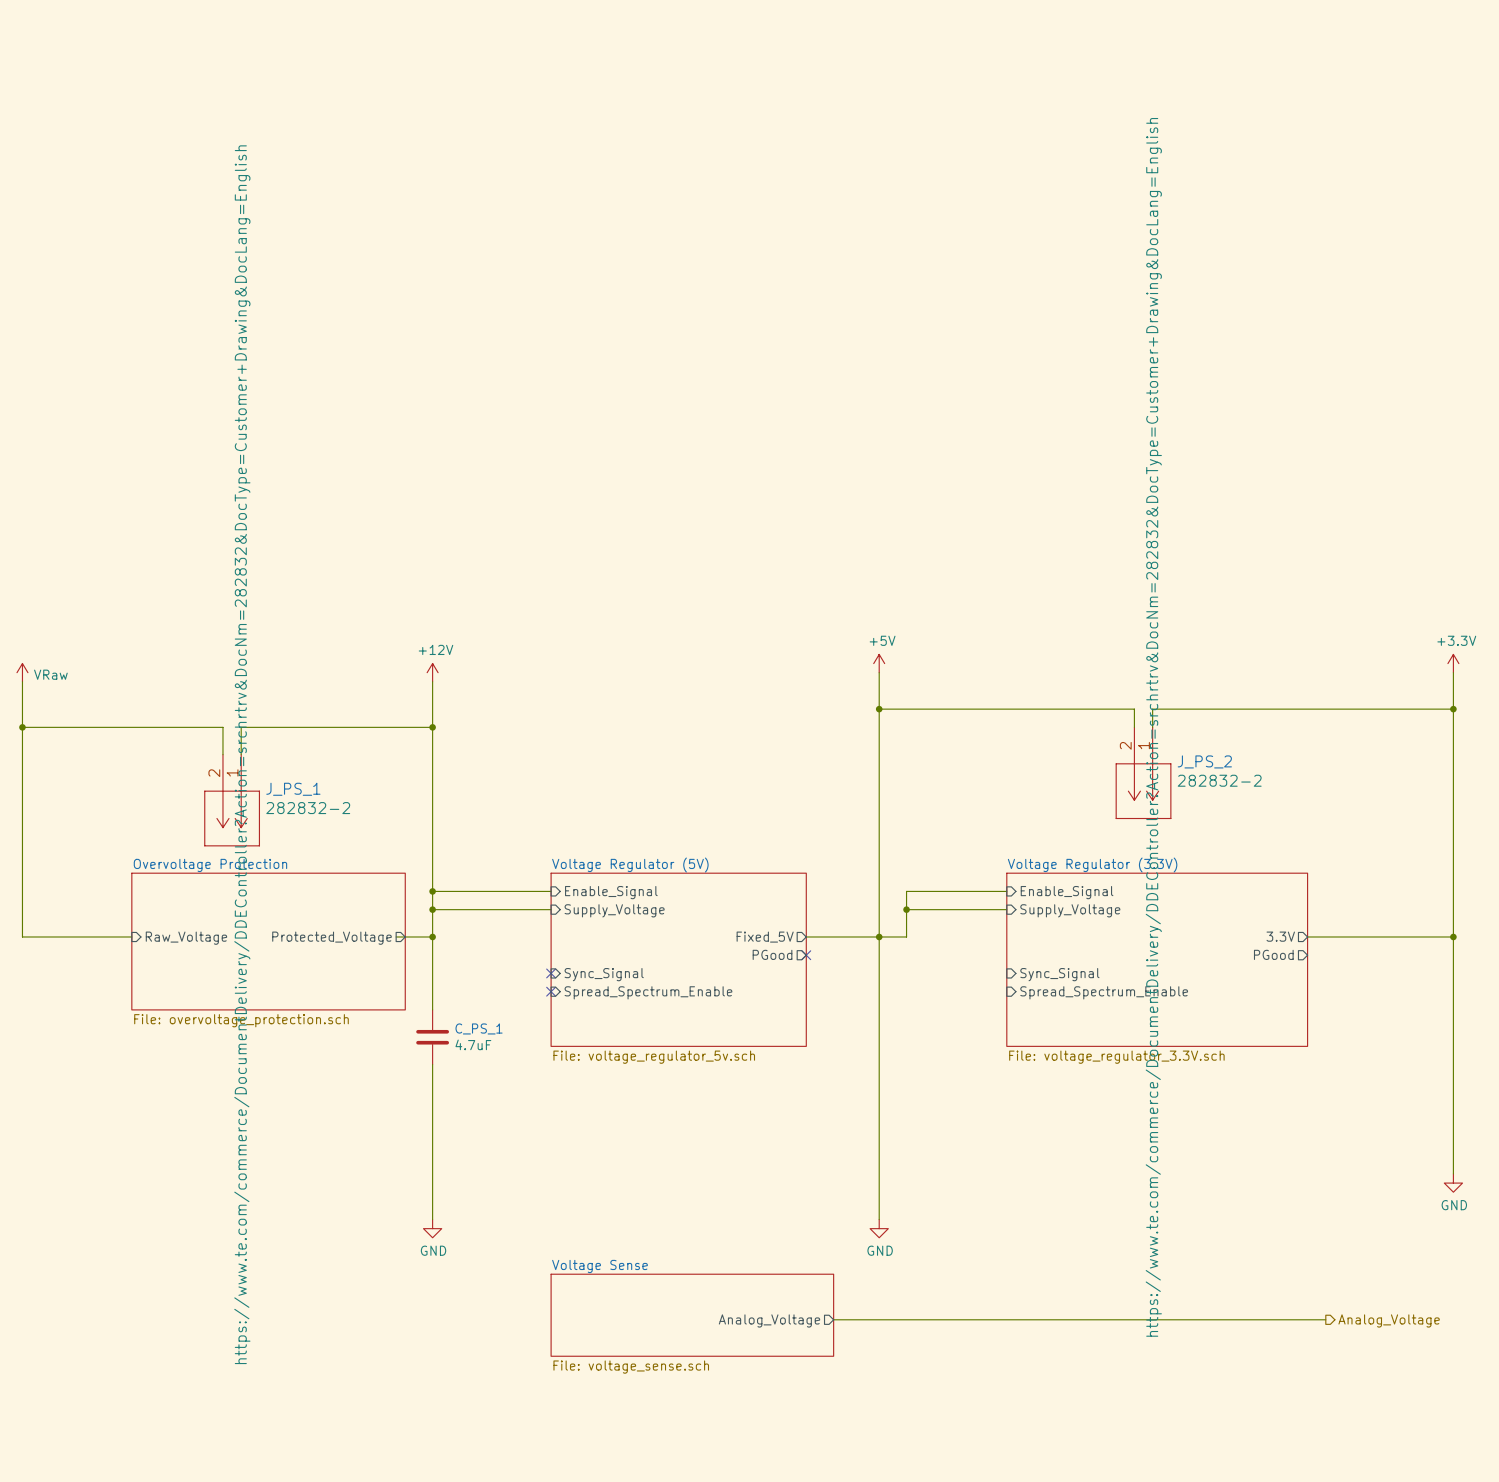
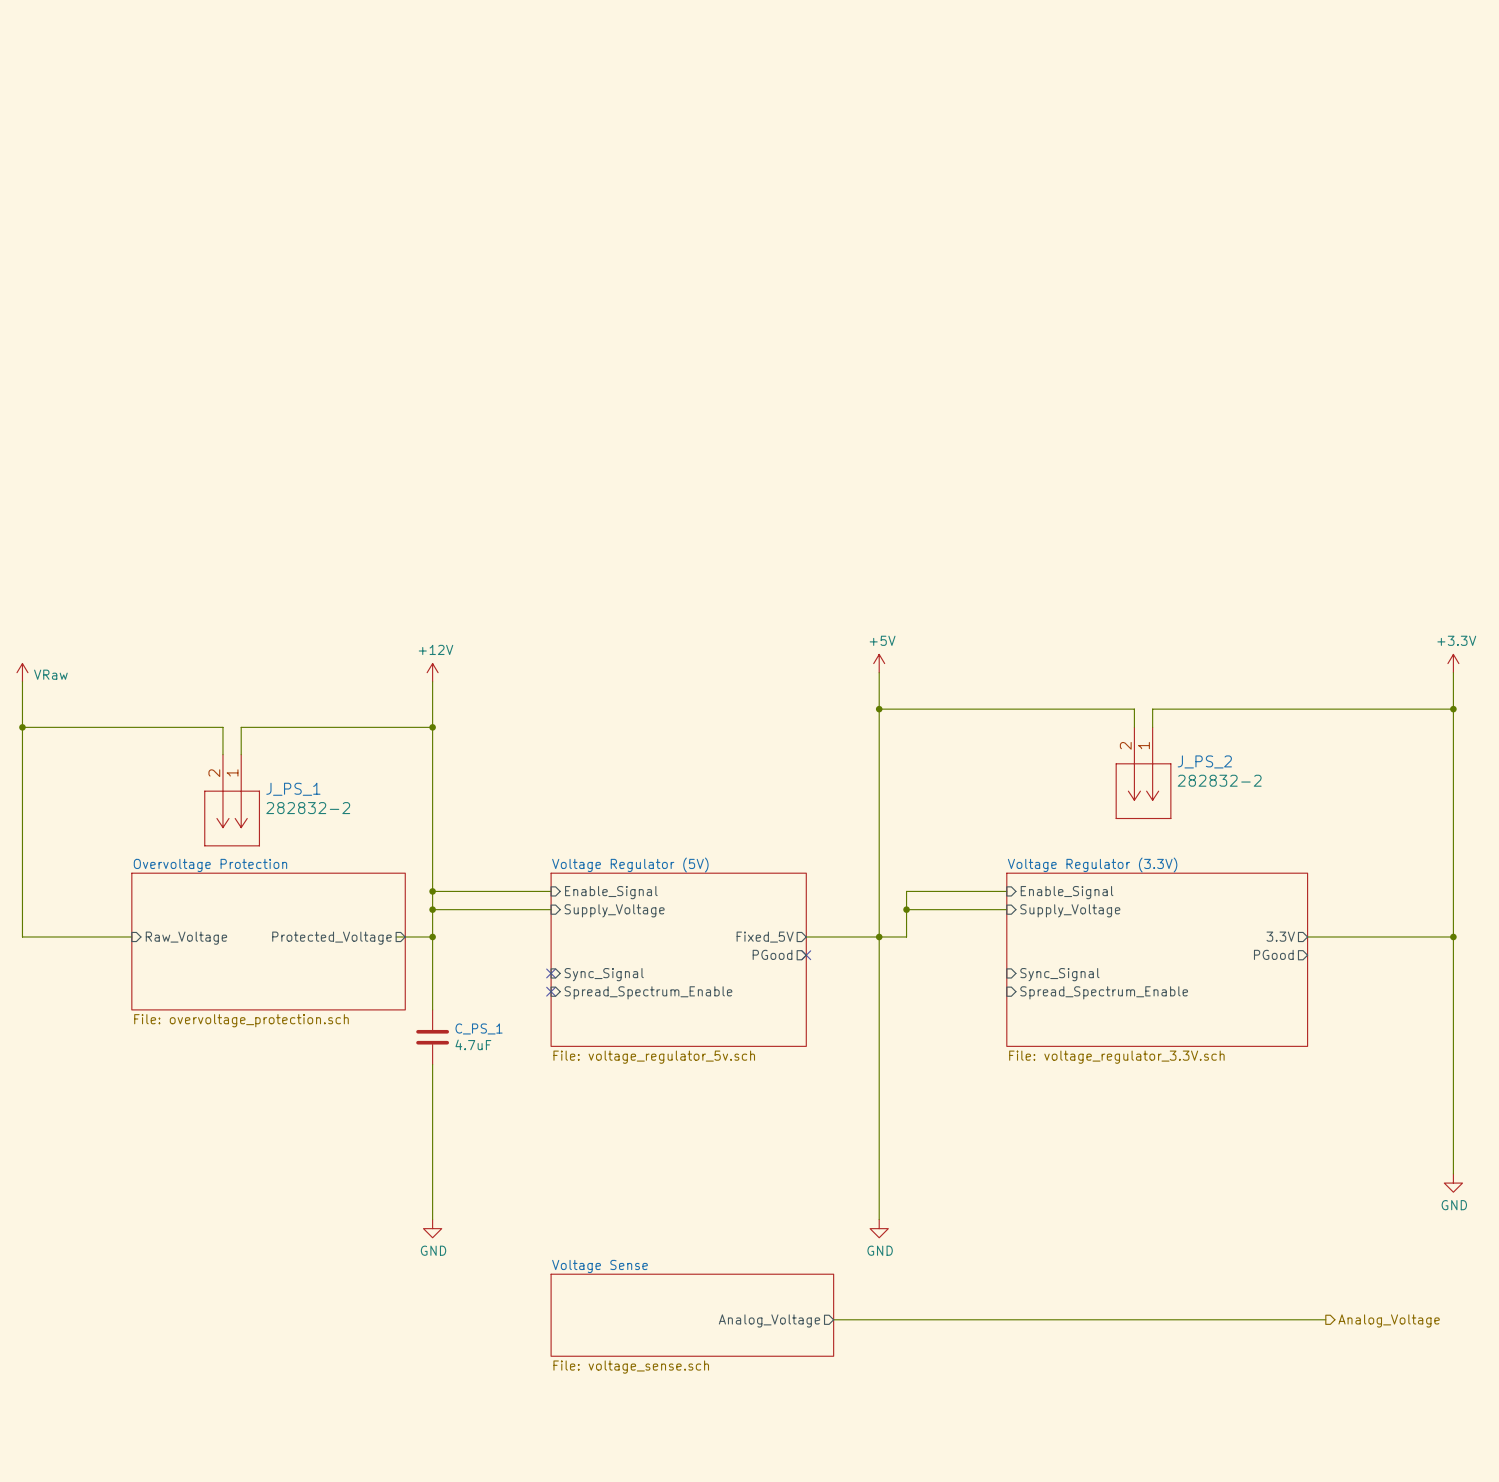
J_PS_2 text: https://www.te.com/commerce/DocumentDelivery/DDEController?Action=srchrtrv&DocNm=282832&DocType=Customer+Drawing&DocLang=English (1153, 727) -> none
J_PS_1 text: https://www.te.com/commerce/DocumentDelivery/DDEController?Action=srchrtrv&DocNm=282832&DocType=Customer+Drawing&DocLang=English (242, 754) -> none

